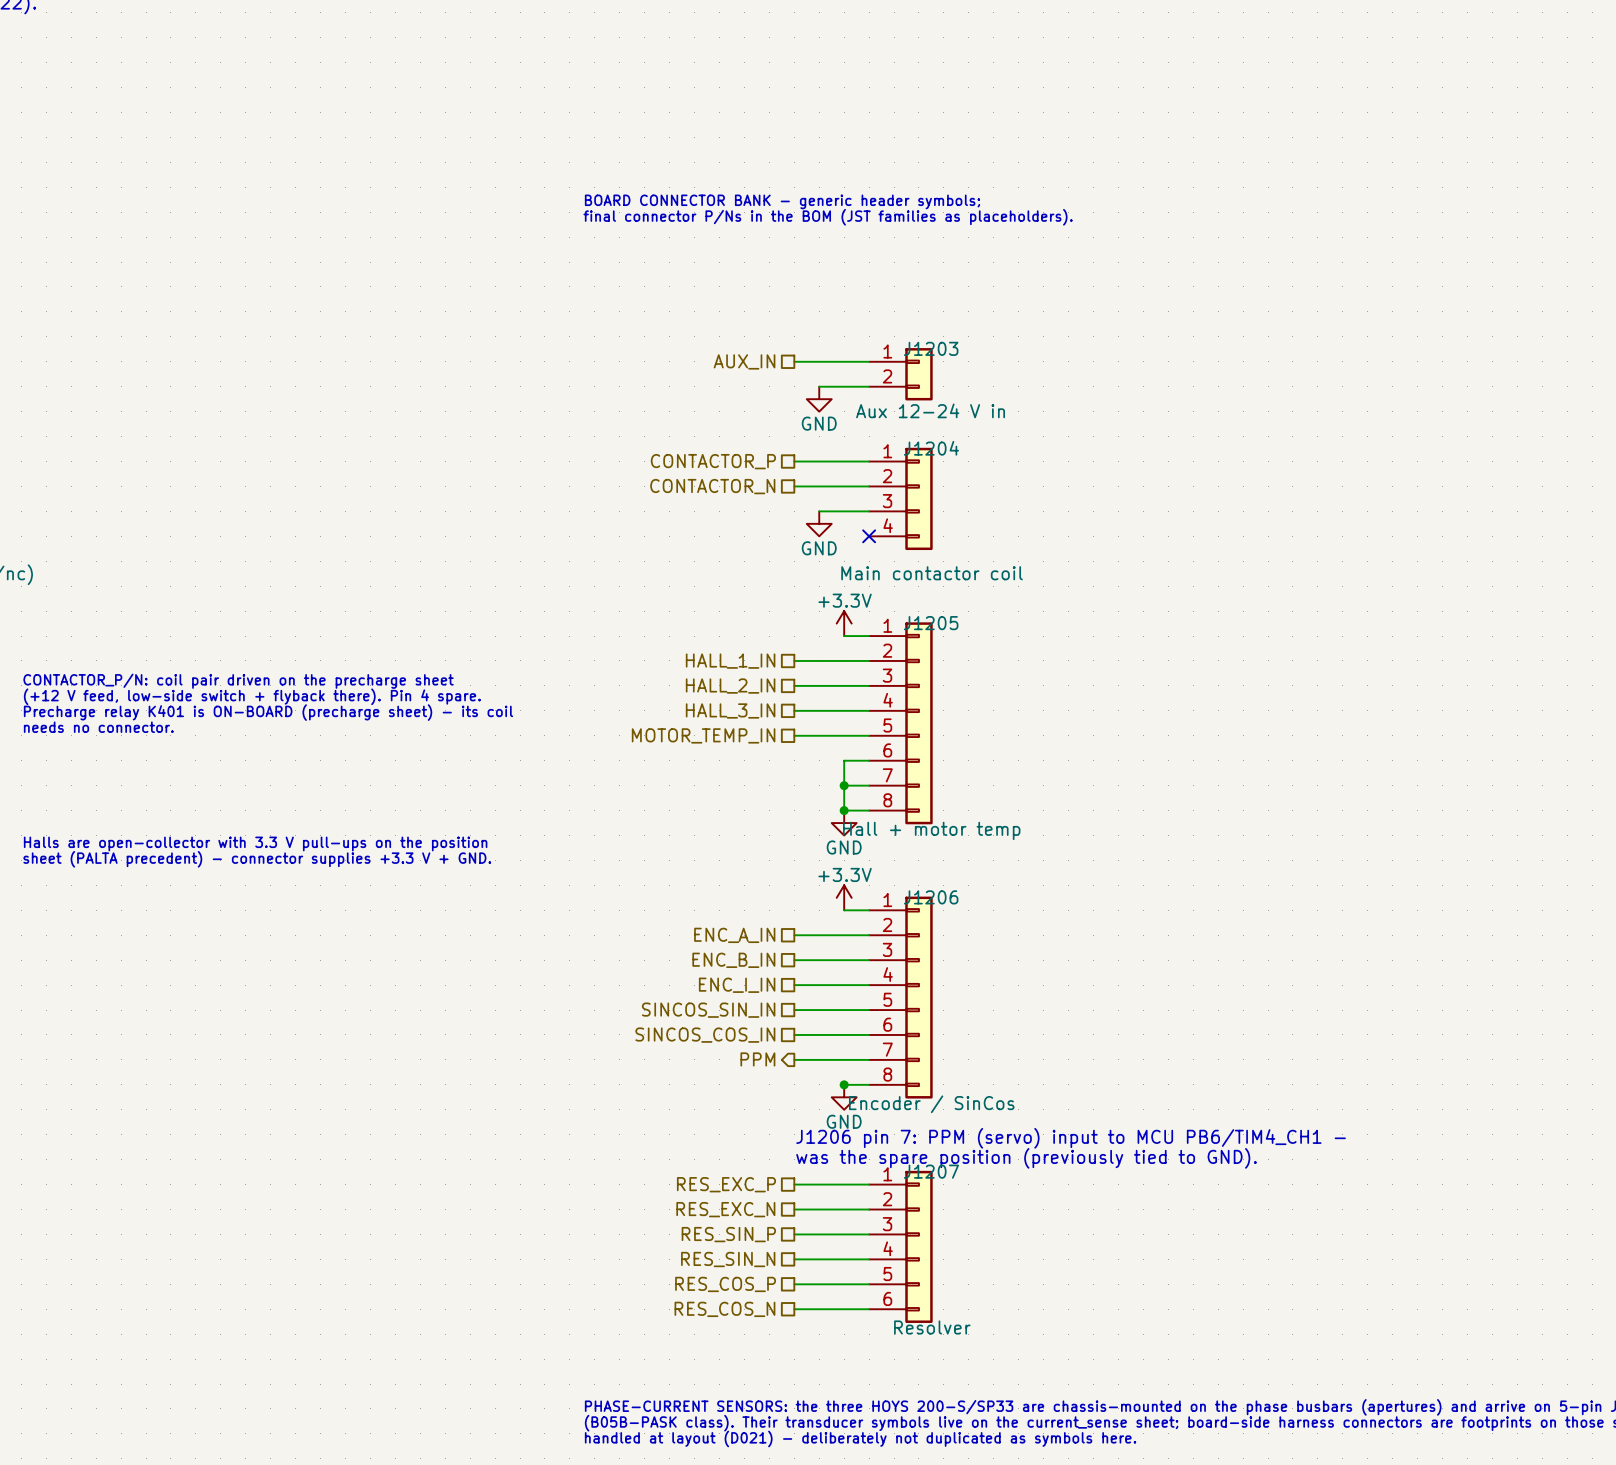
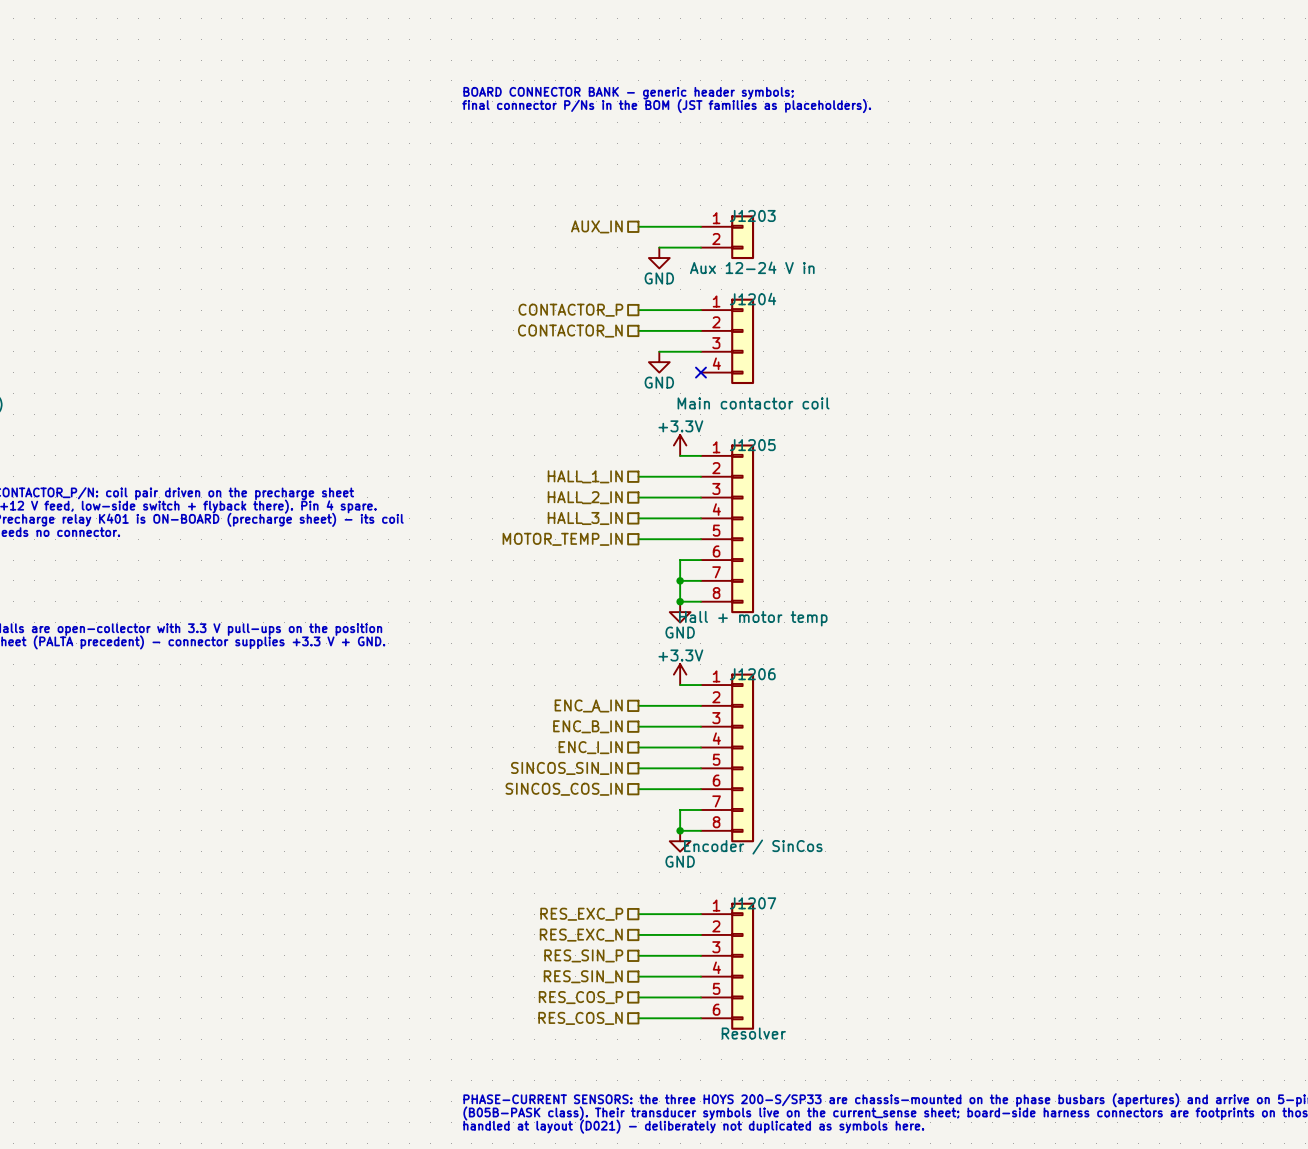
hierarchical label: PPM (757, 1059) -> none
wire: (794, 1059) (844, 1059) -> (680, 830) (680, 810)
text: J1206 pin 7: PPM (servo) input to MCU PB6/TIM4_CH1 - (1071, 1138) -> none
text: was the spare position (previously tied to GND). (1026, 1158) -> none

